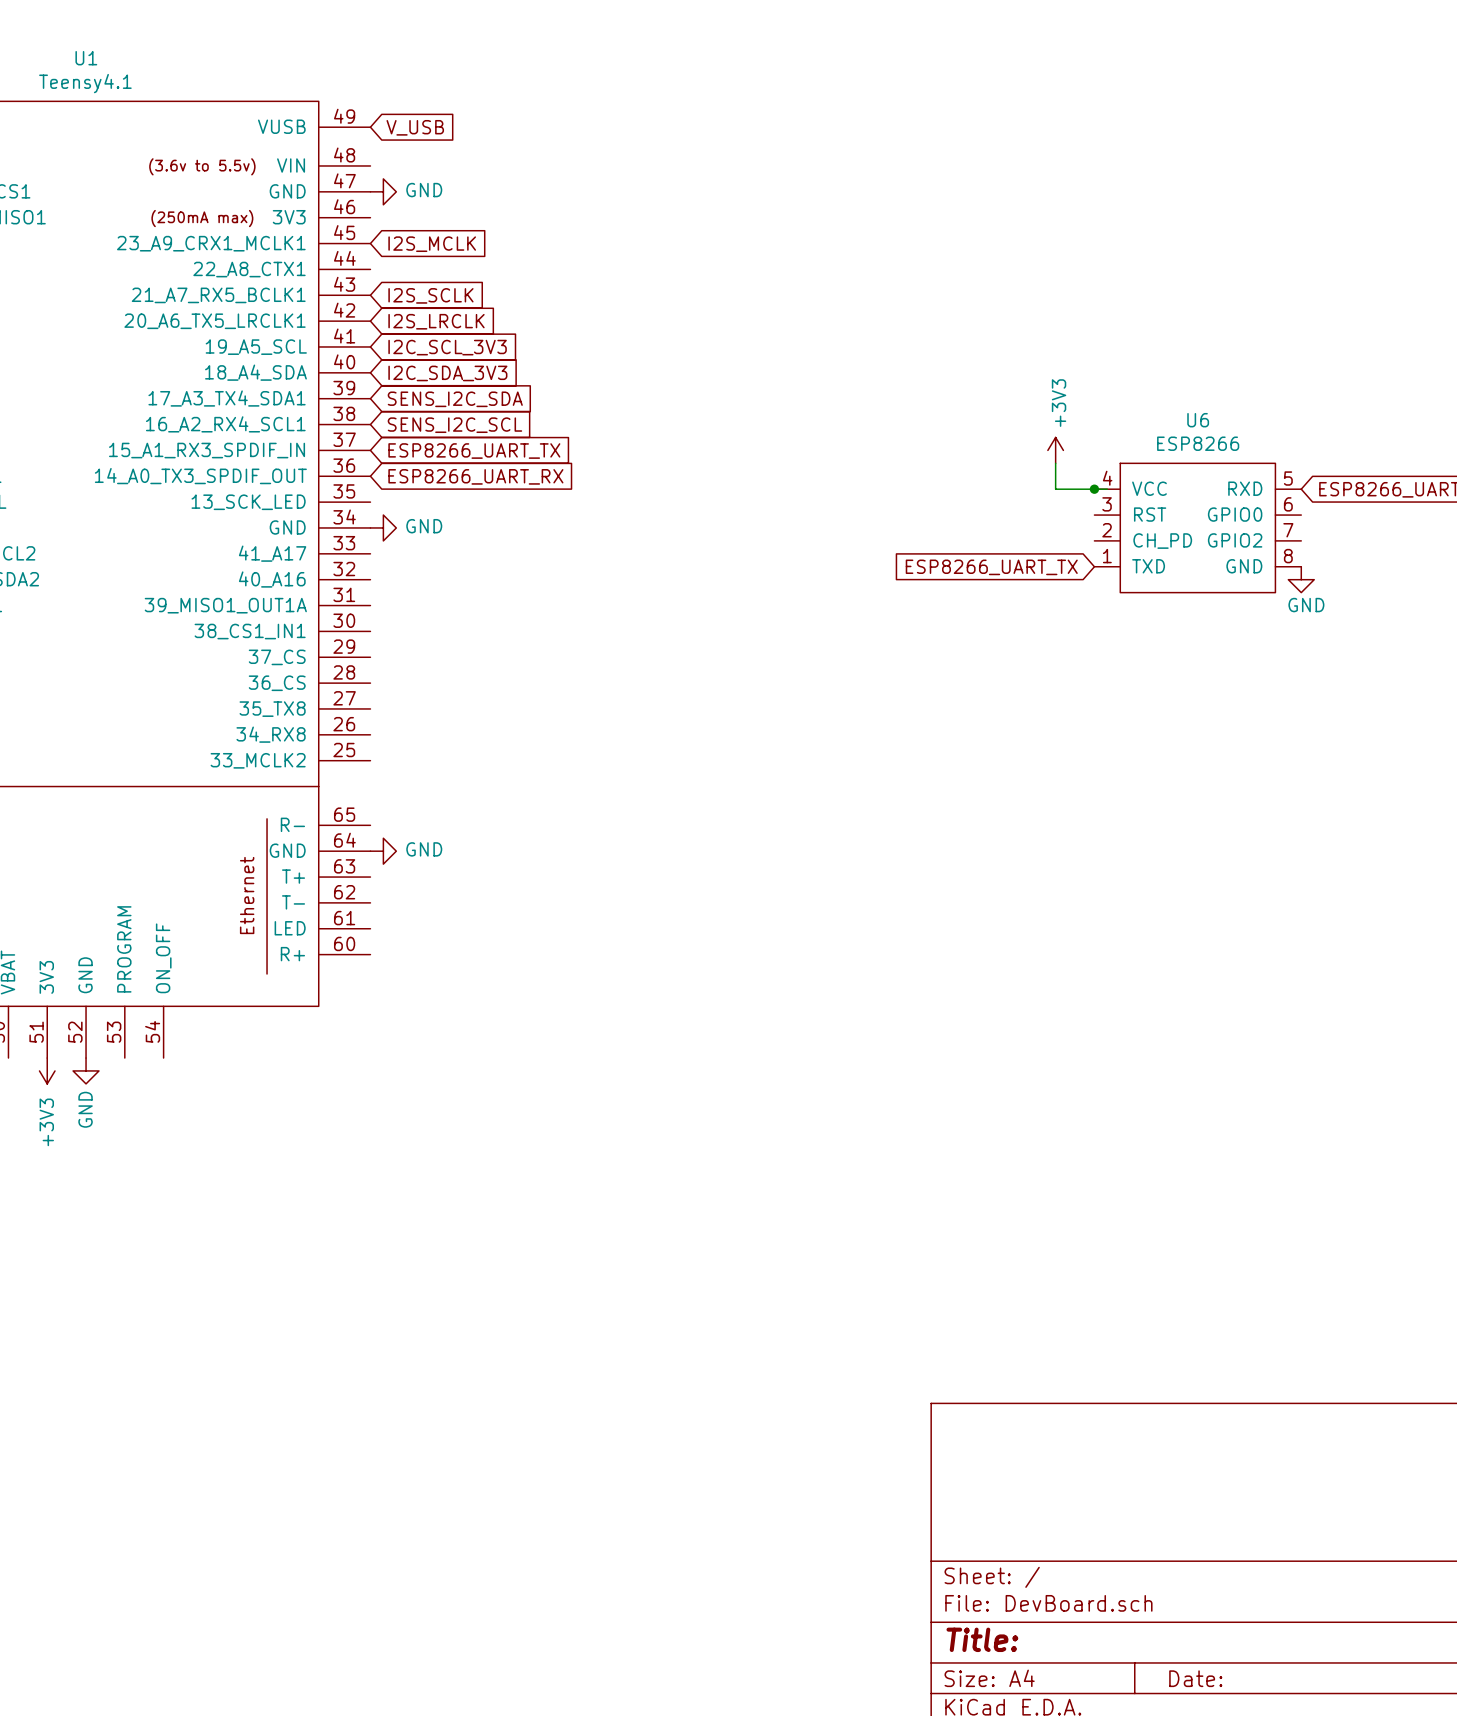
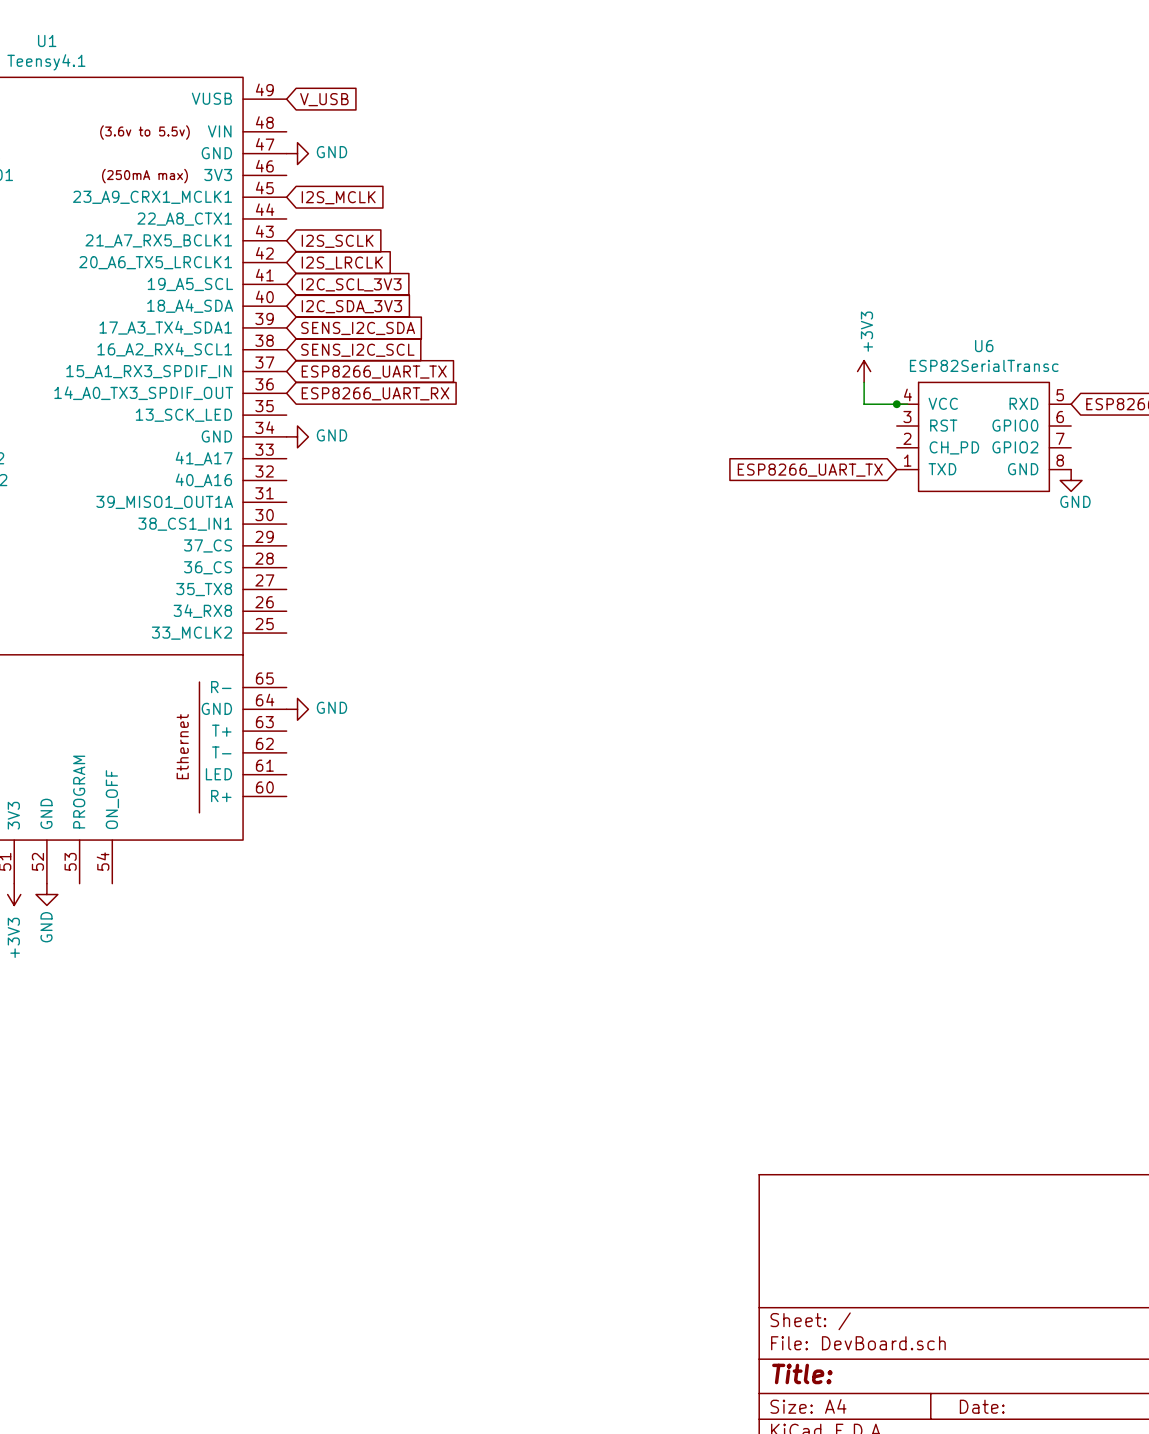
U6 value: ESP8266 (1198, 443) -> ESP82SerialTransc (984, 365)

